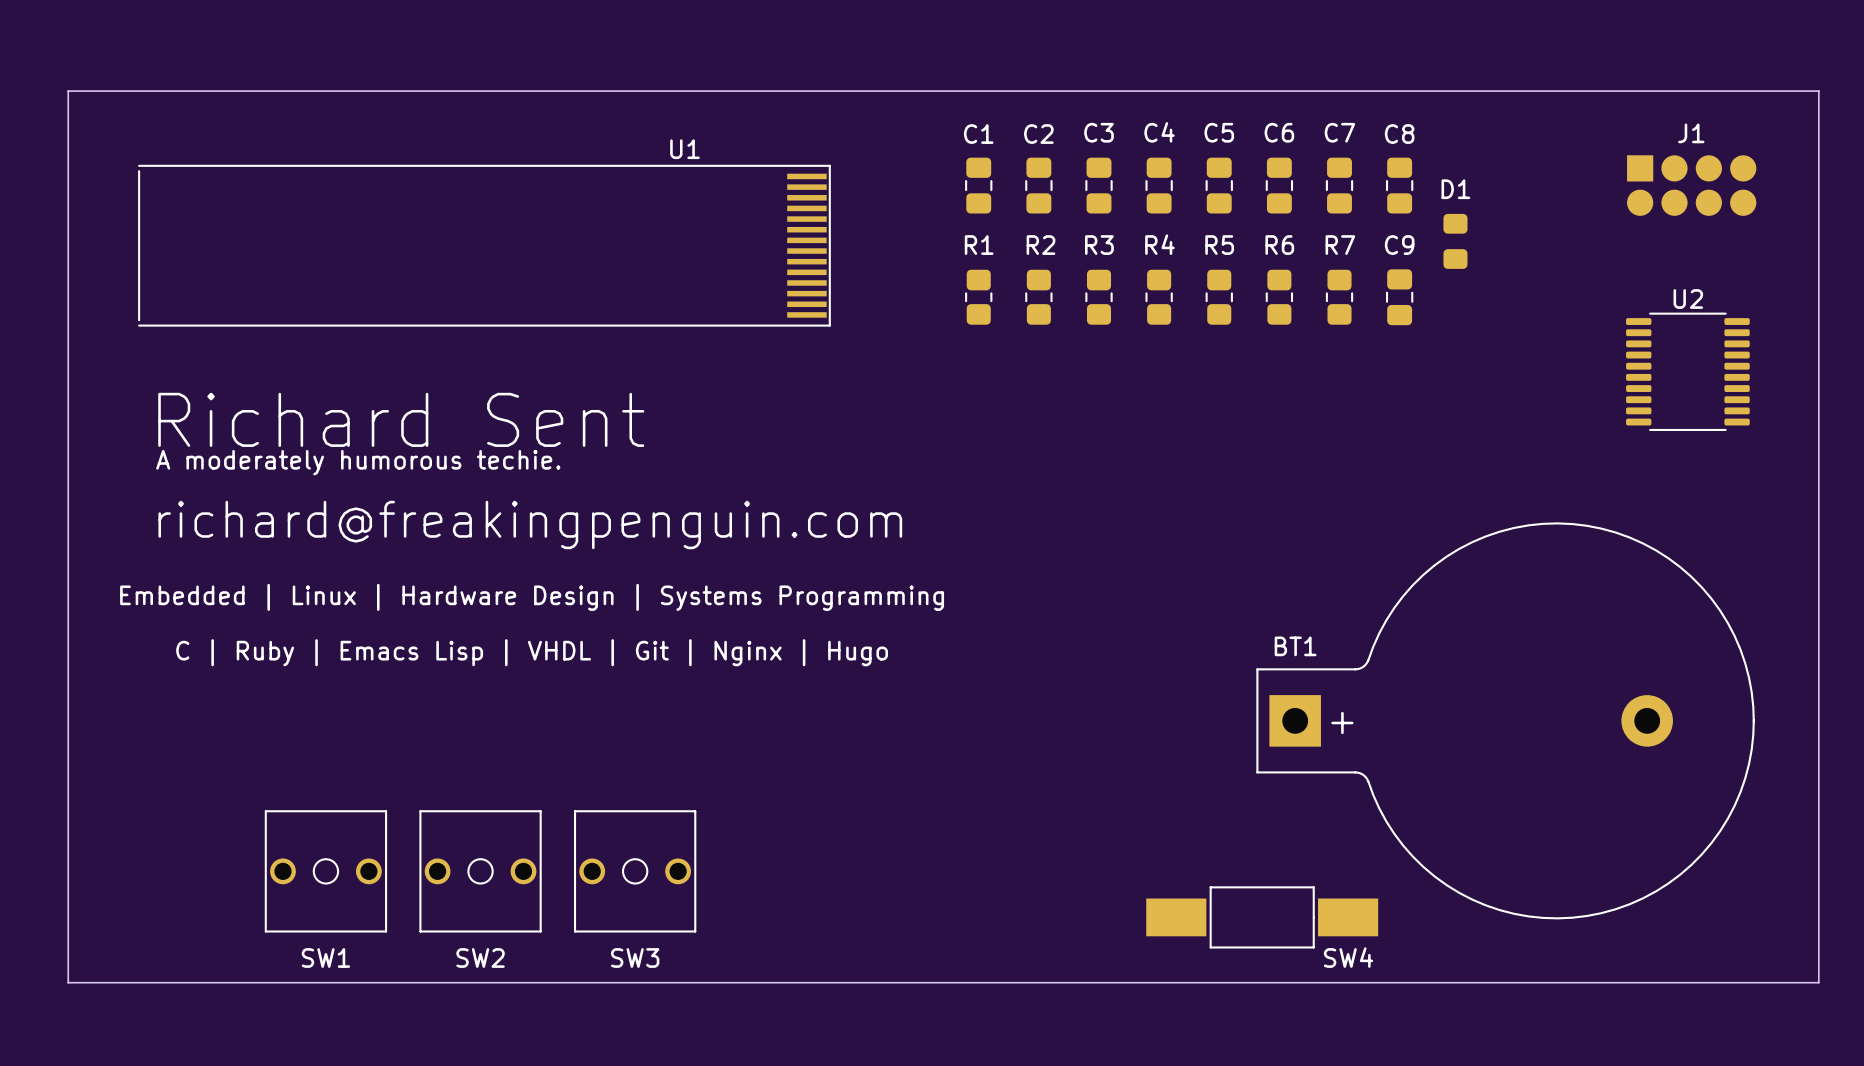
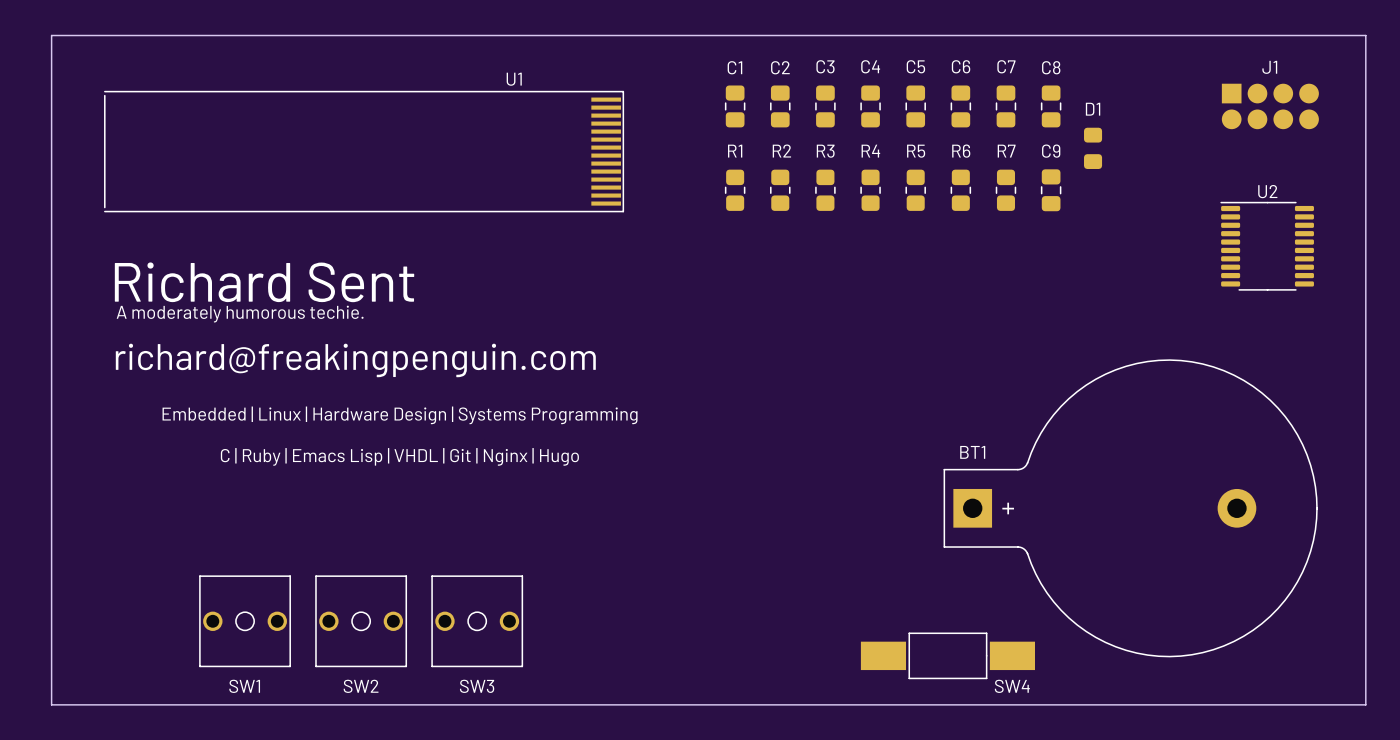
U2 footprint: [1626, 312, 1750, 431] -> [1220, 201, 1314, 291]

